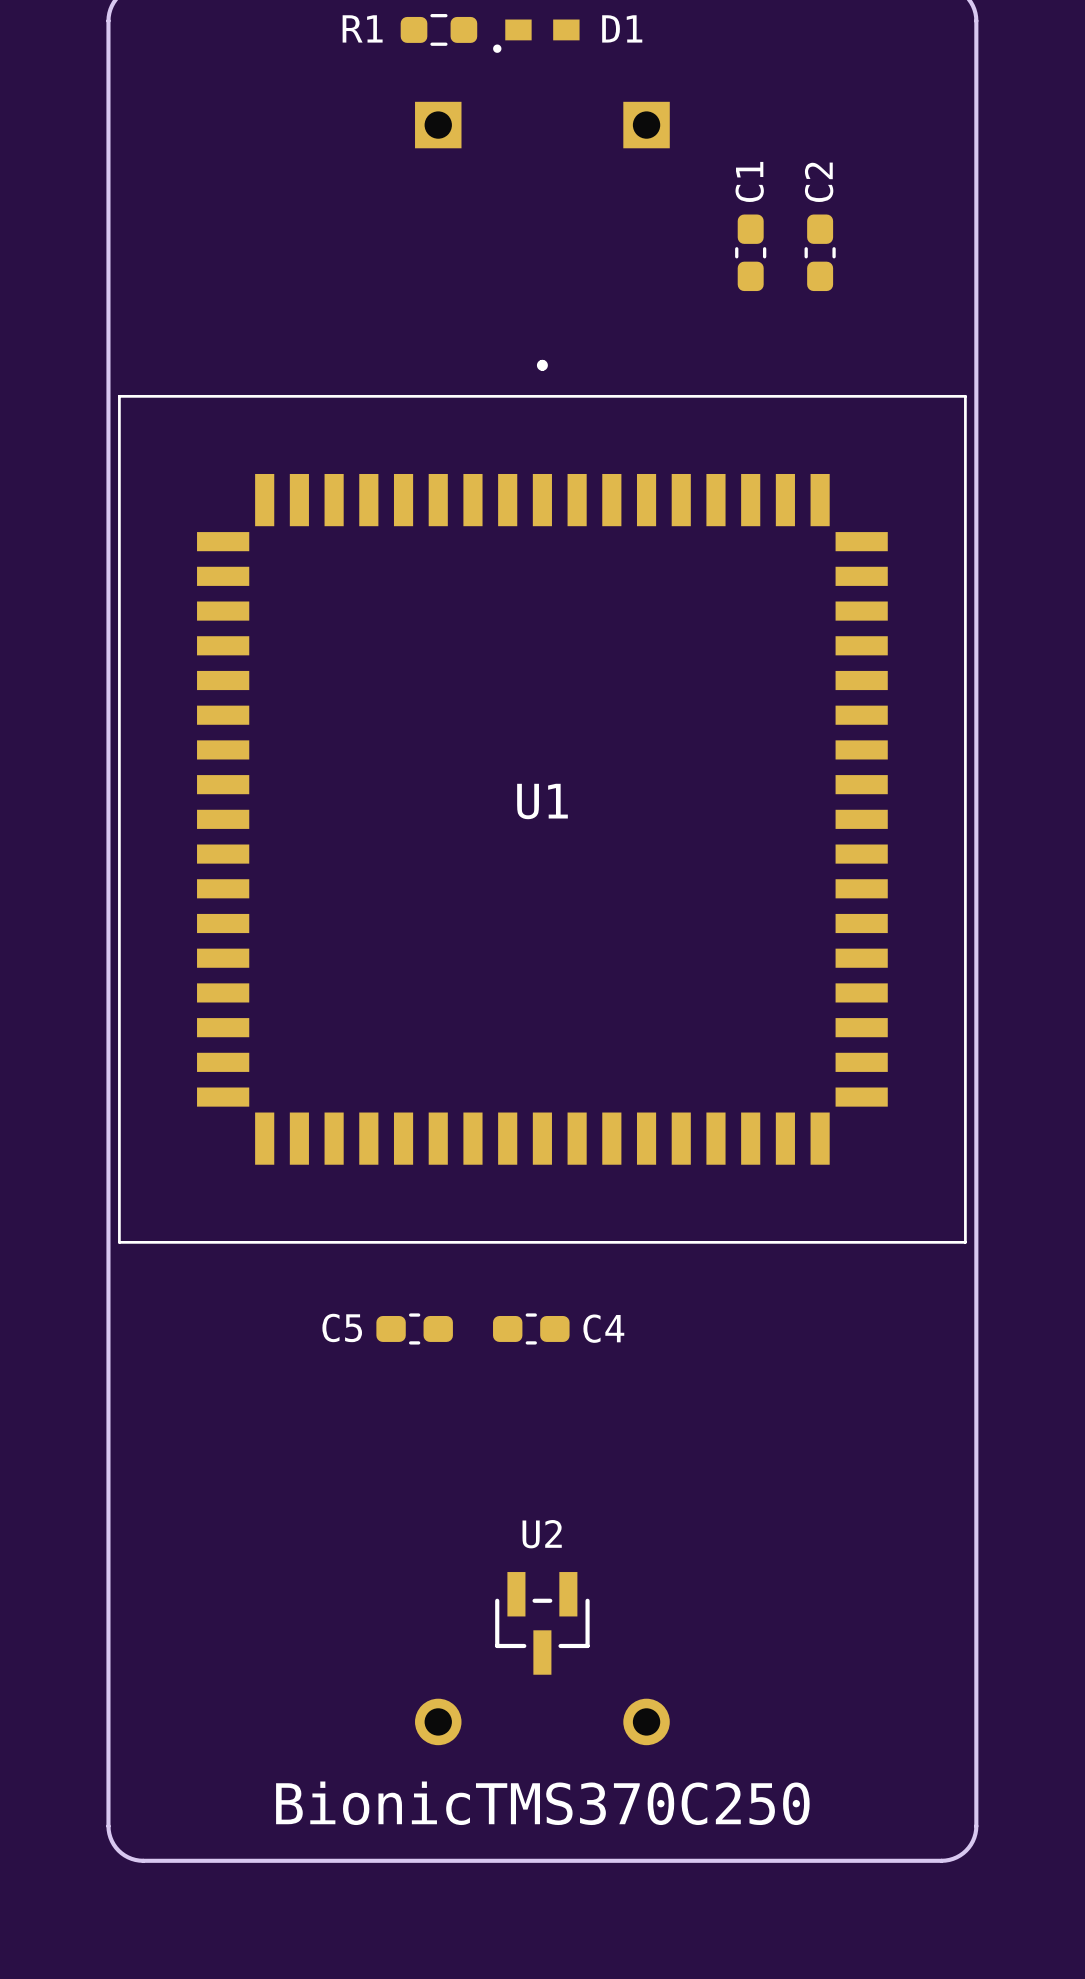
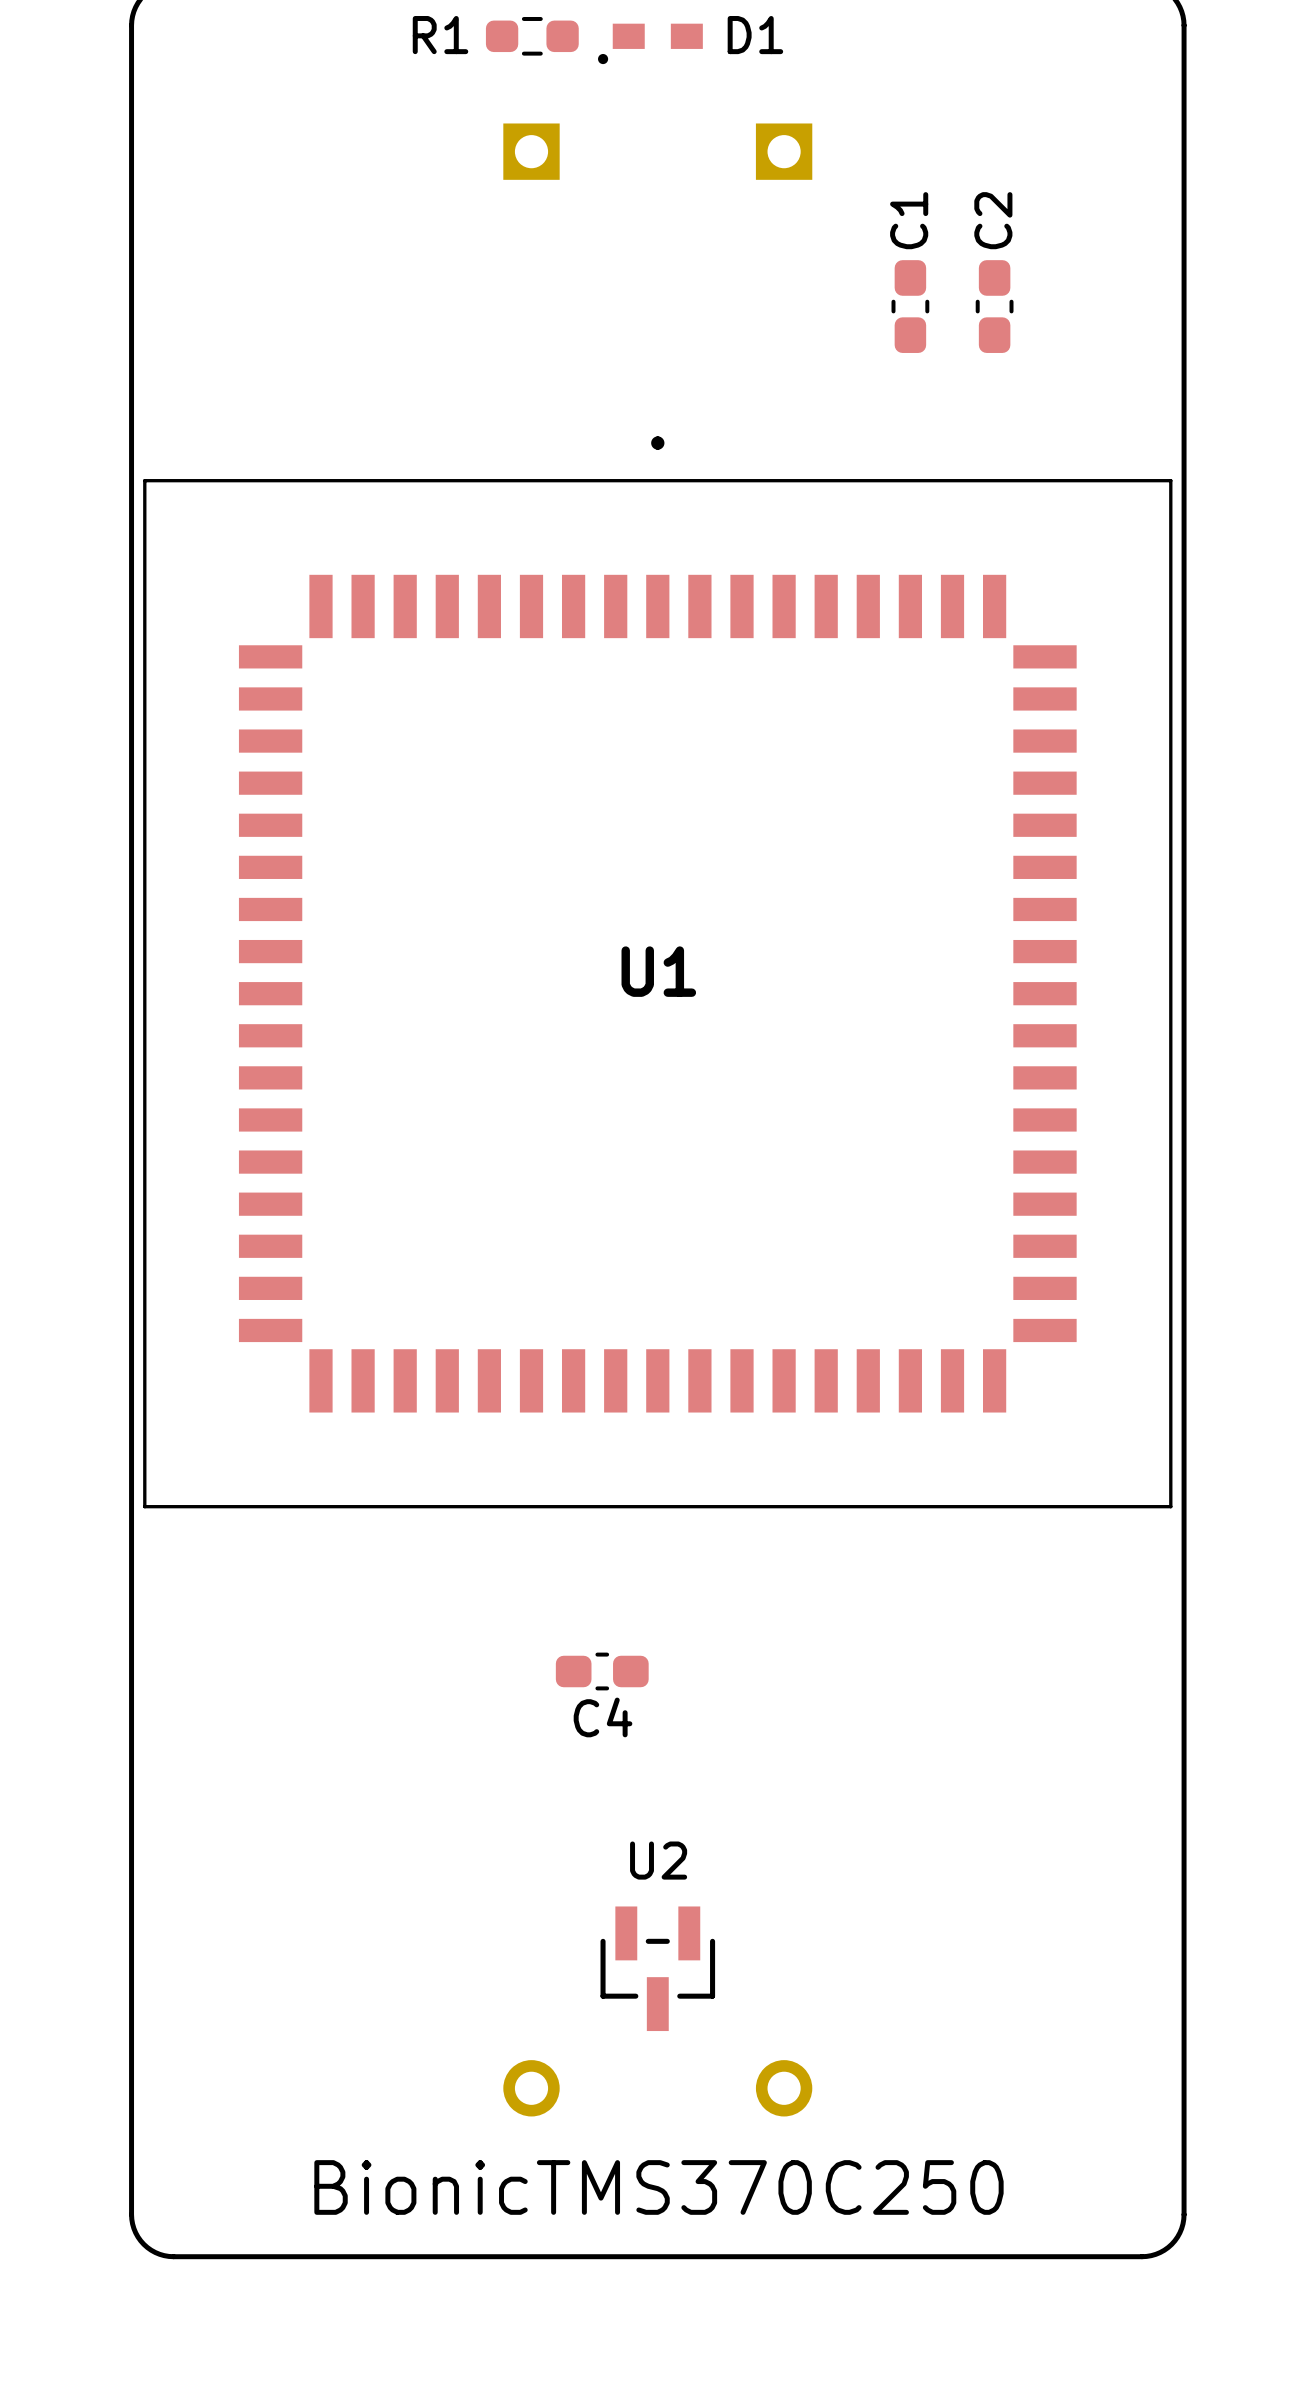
C5: (414, 1328) -> none
C4 position: (531, 1328) -> (602, 1671)
C4 name position: C4 (603, 1328) -> C4 (603, 1717)

